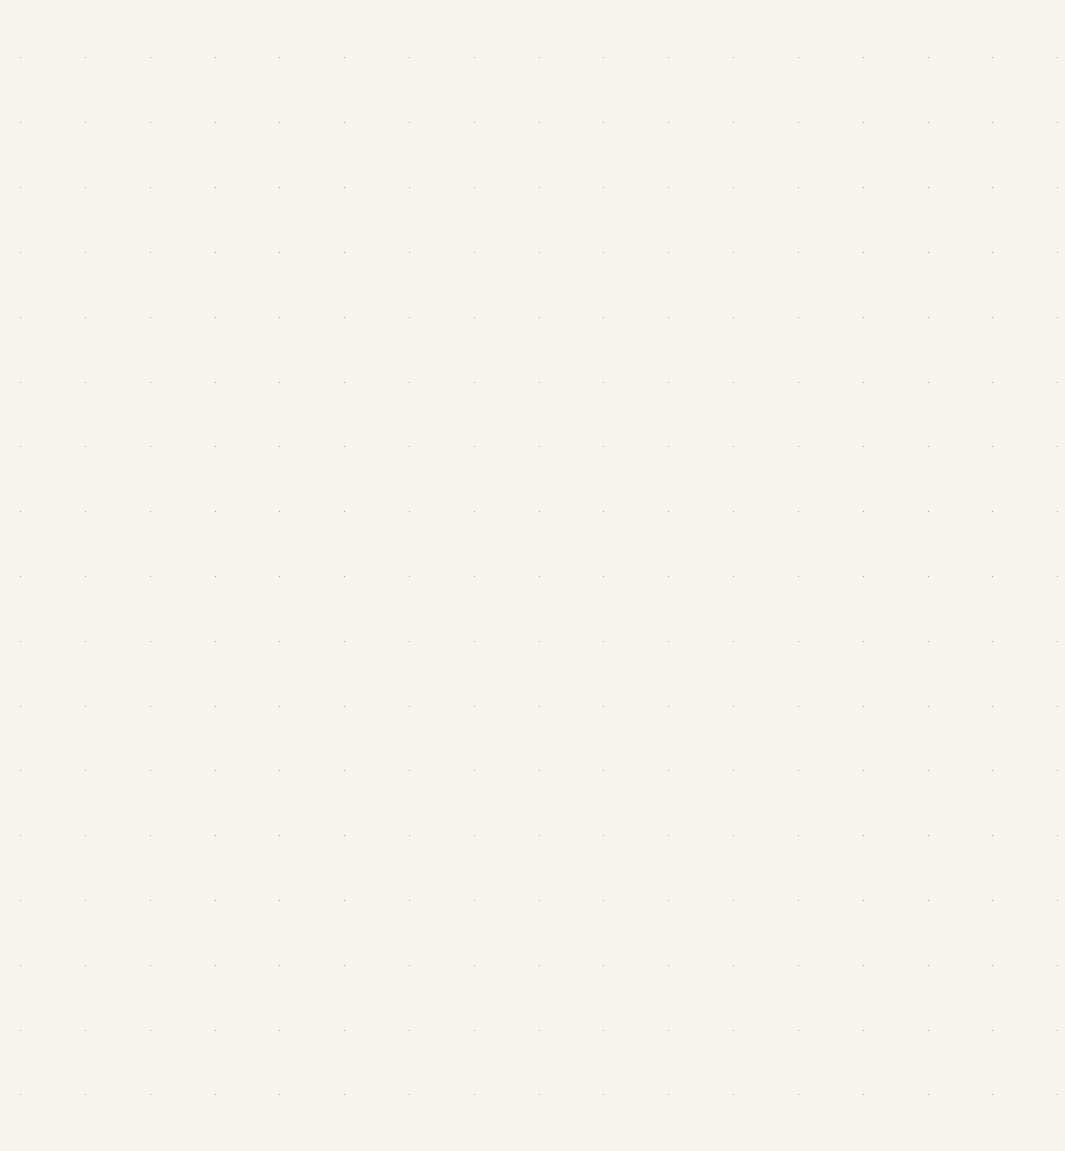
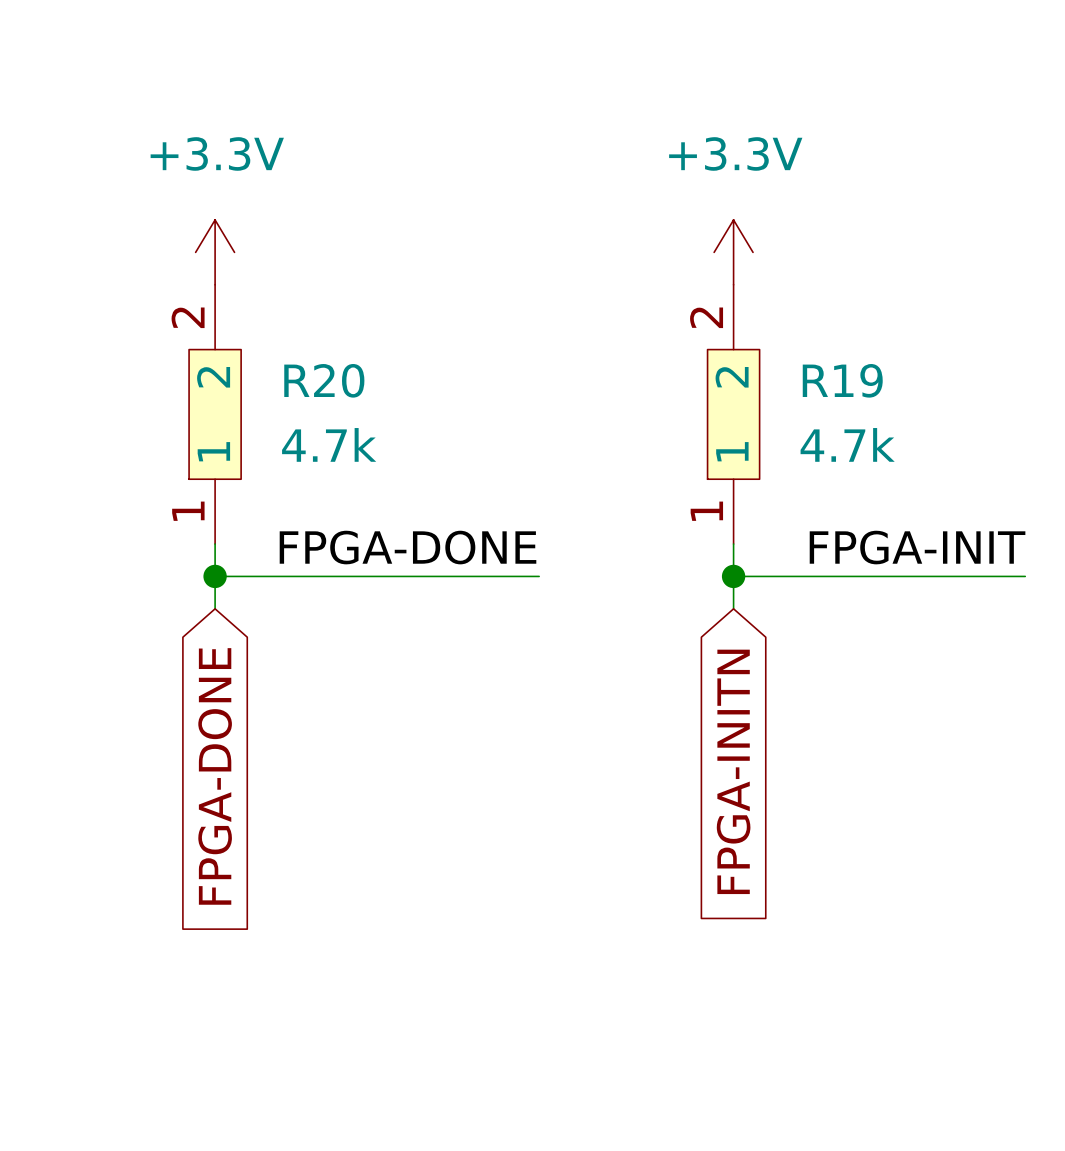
power symbol: none -> +3.3V (215, 252)
power symbol: none -> +3.3V (733, 252)
R20: none -> 4.7k (215, 414)
R19: none -> 4.7k (733, 414)
wire: none -> (215, 544) (215, 608)
wire: none -> (733, 544) (733, 608)
label: none -> FPGA-DONE (408, 547)
label: none -> FPGA-INIT (917, 547)
wire: none -> (215, 576) (539, 576)
junction: none -> (215, 576)
wire: none -> (733, 576) (1025, 576)
junction: none -> (733, 576)
global label: none -> FPGA-INITN (733, 771)
global label: none -> FPGA-DONE (215, 776)

